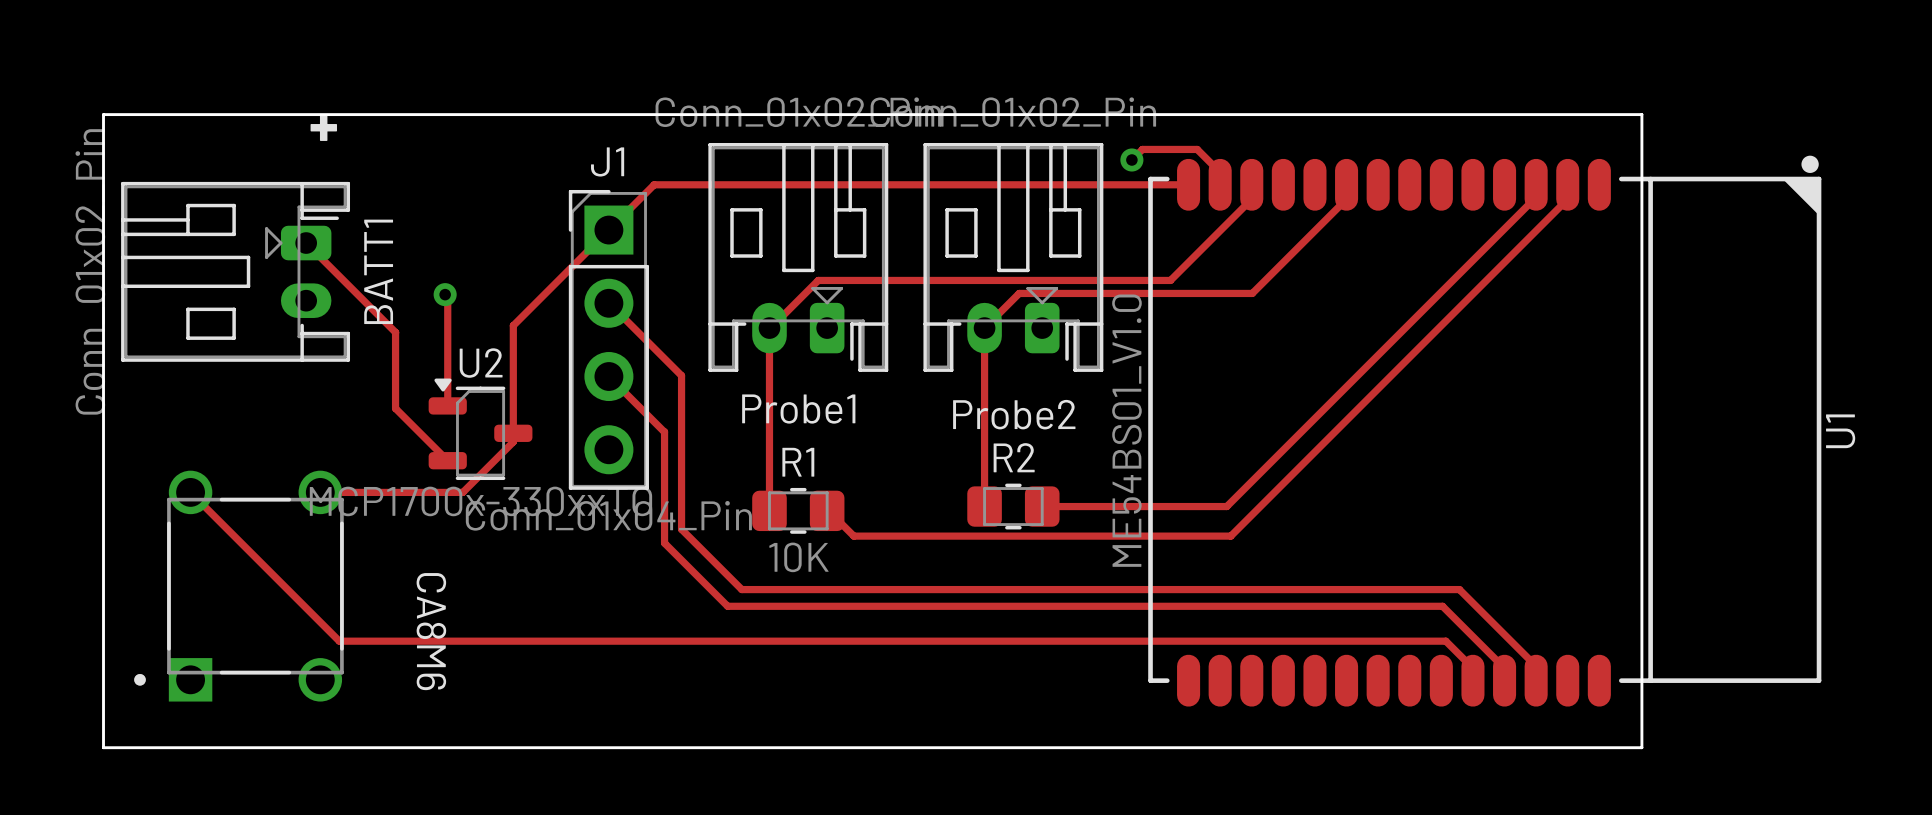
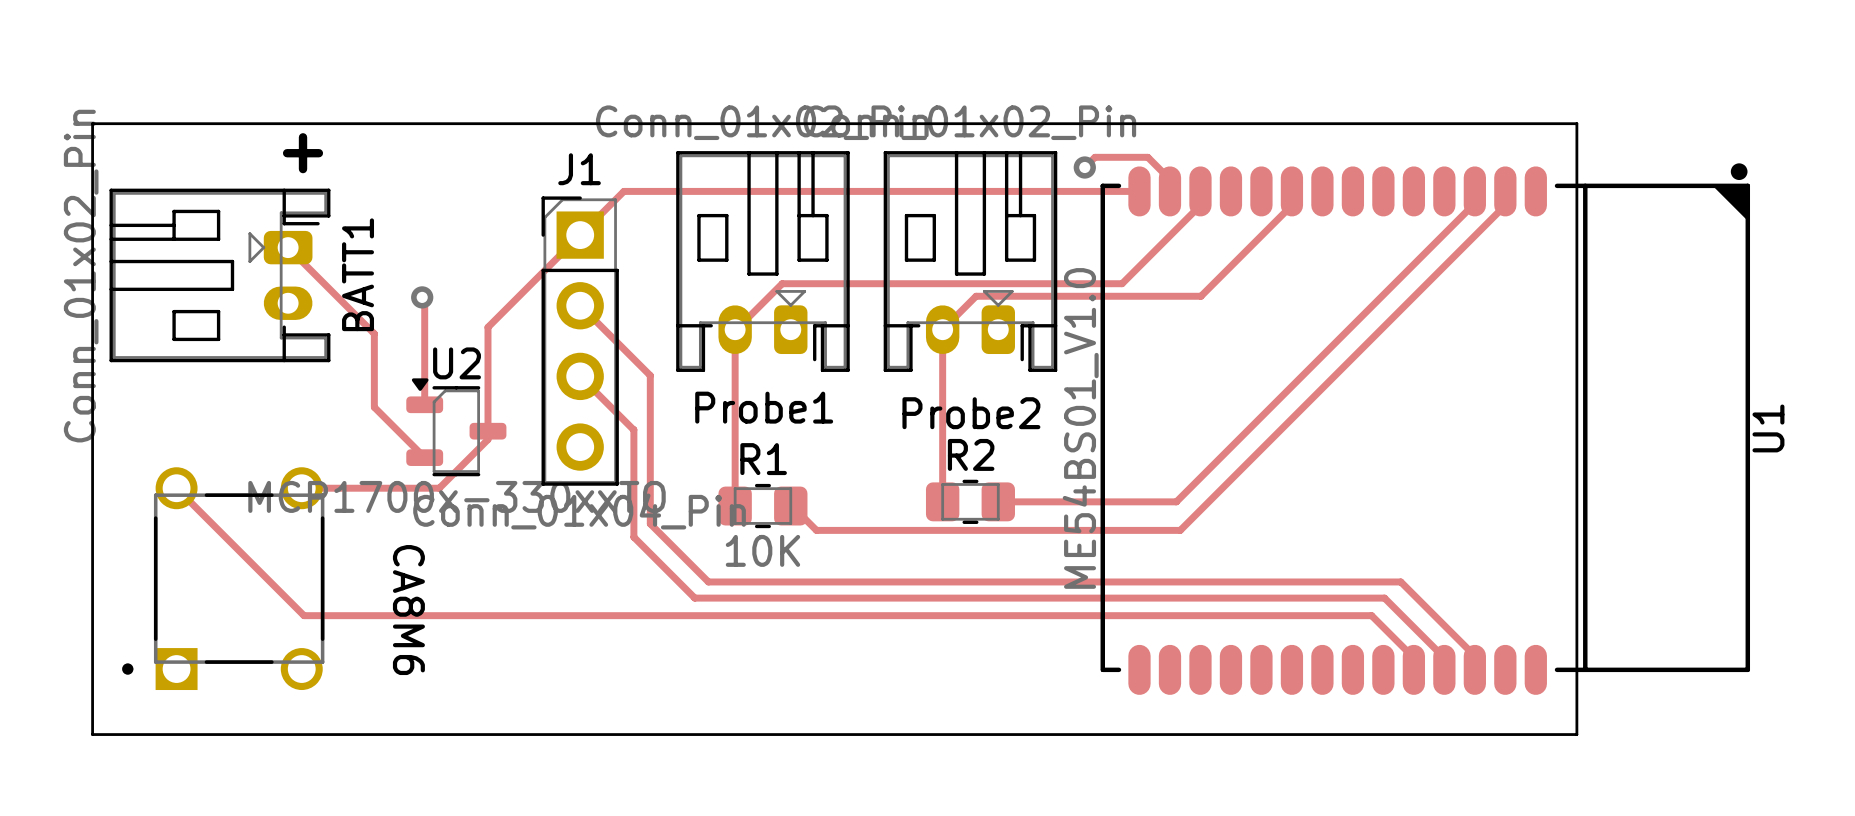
track: (322, 624) (339, 641) (1445, 641) -> (304, 615) (1371, 615) (1387, 631)

